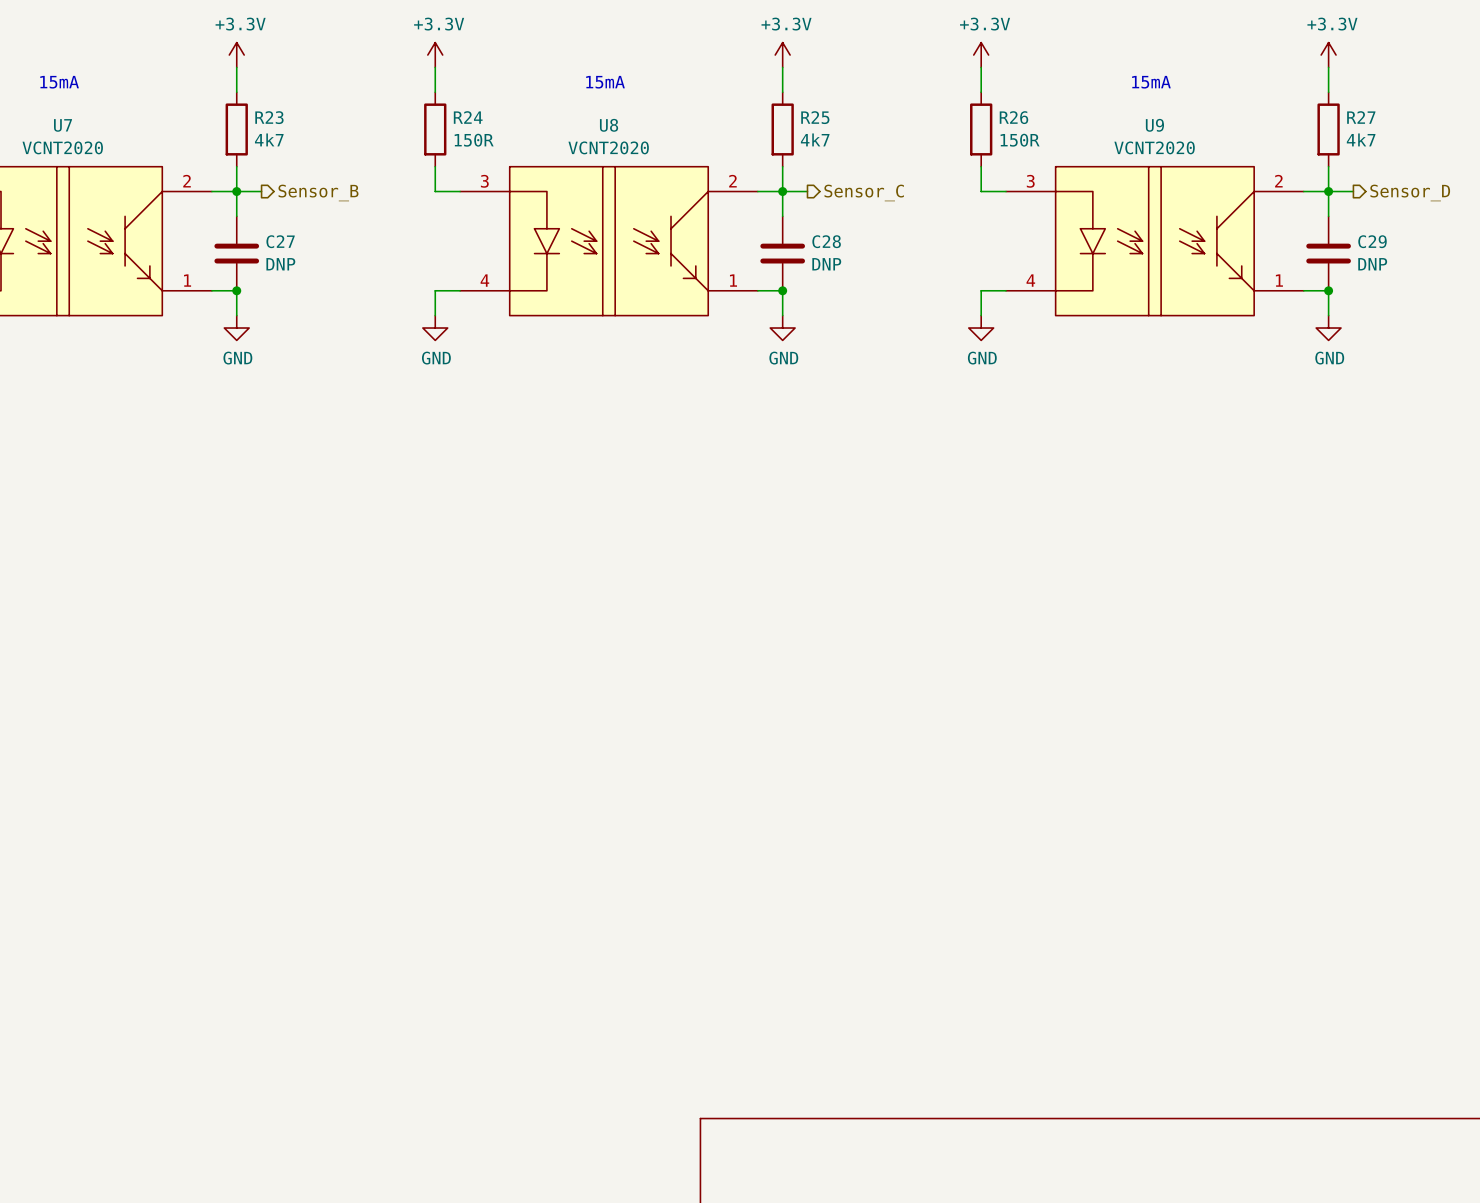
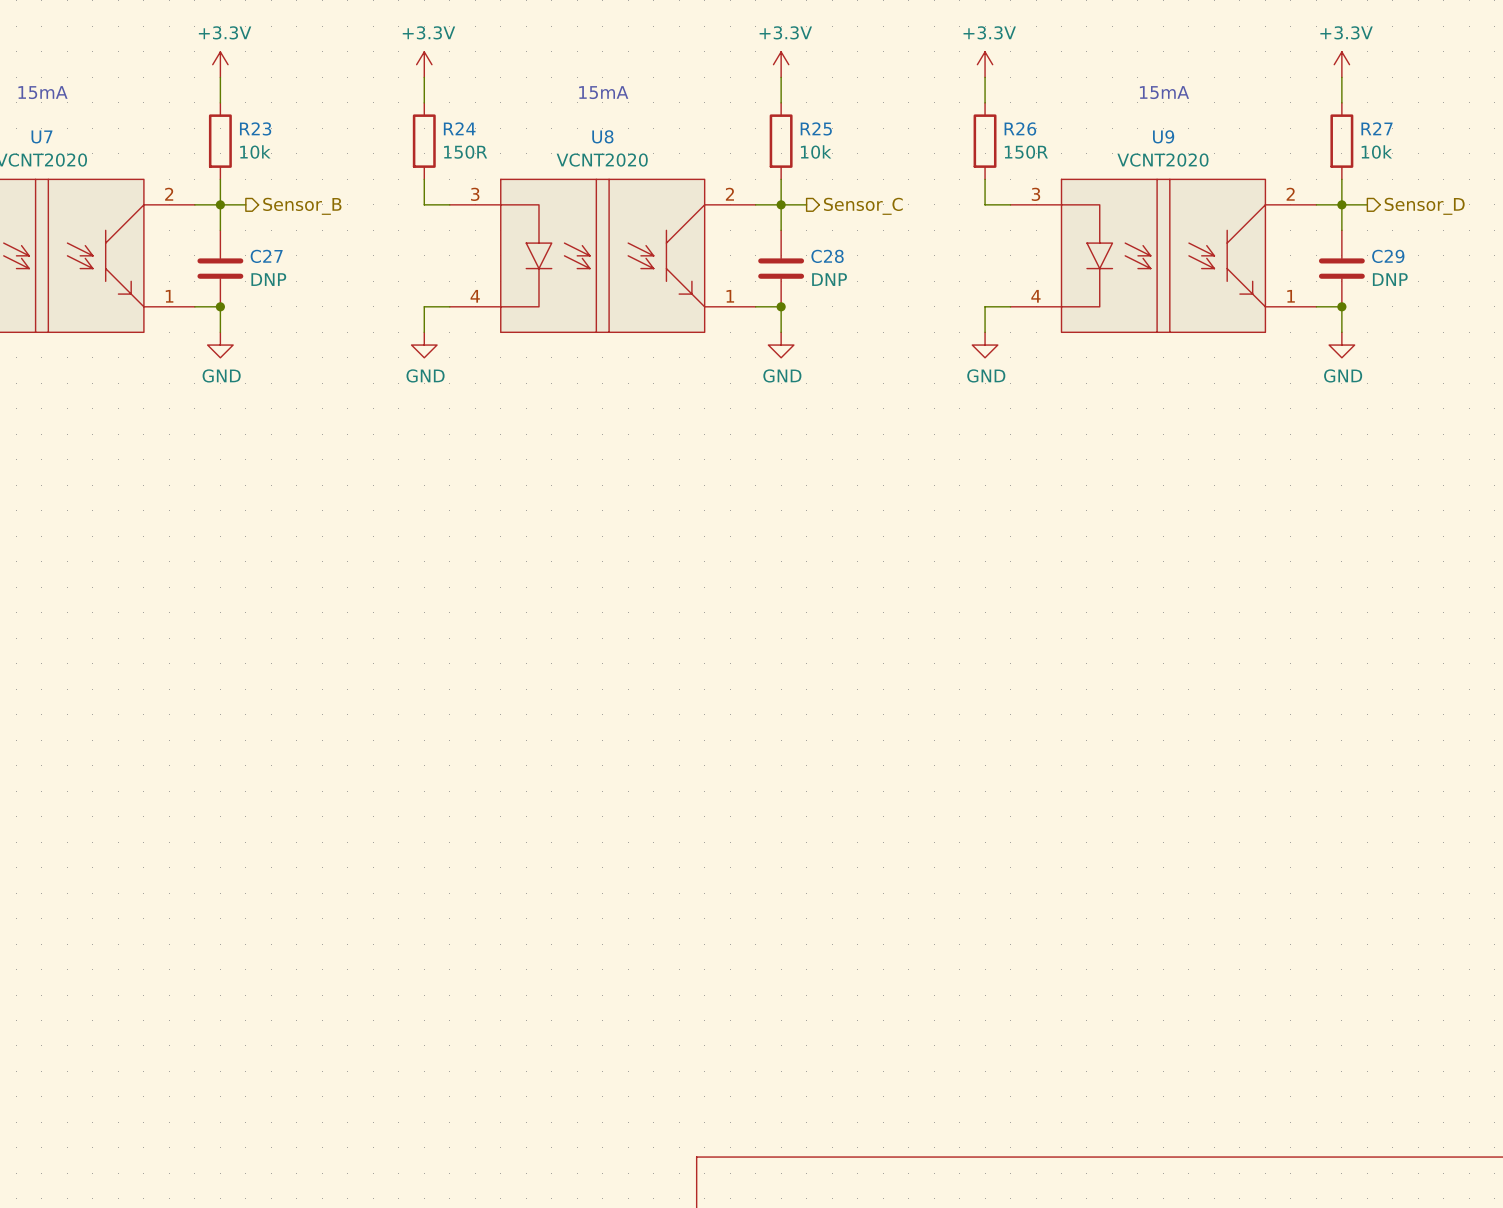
R23 value: 4k7 (269, 139) -> 10k (255, 151)
R25 value: 4k7 (815, 139) -> 10k (816, 151)
R27 value: 4k7 (1361, 139) -> 10k (1376, 151)

